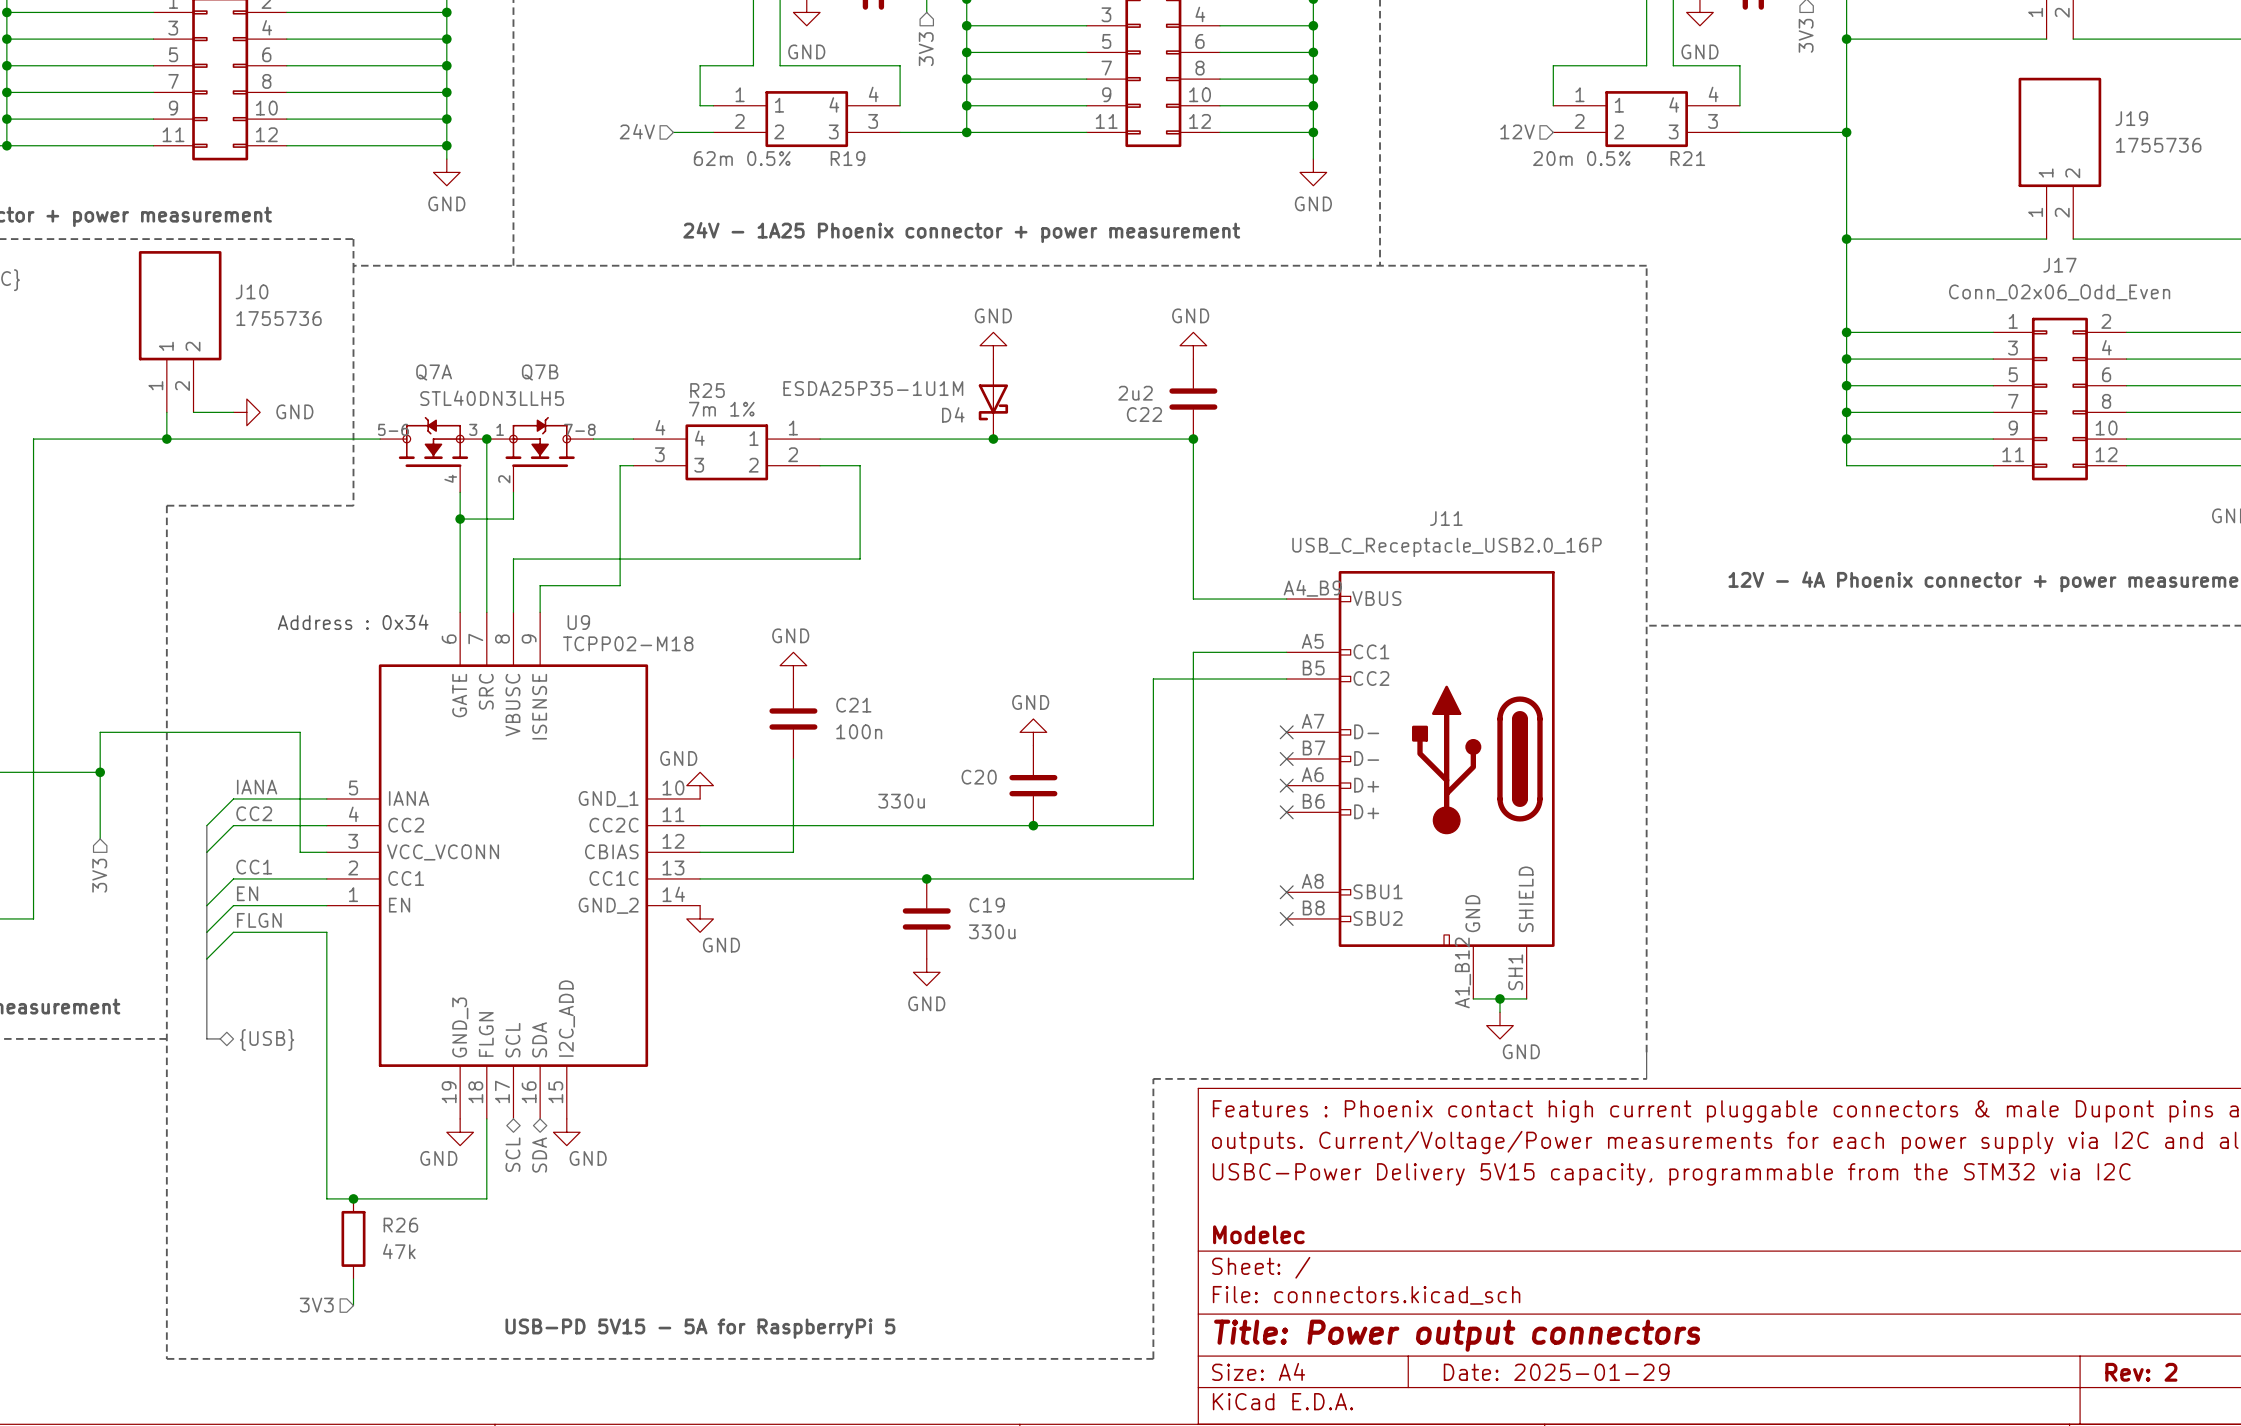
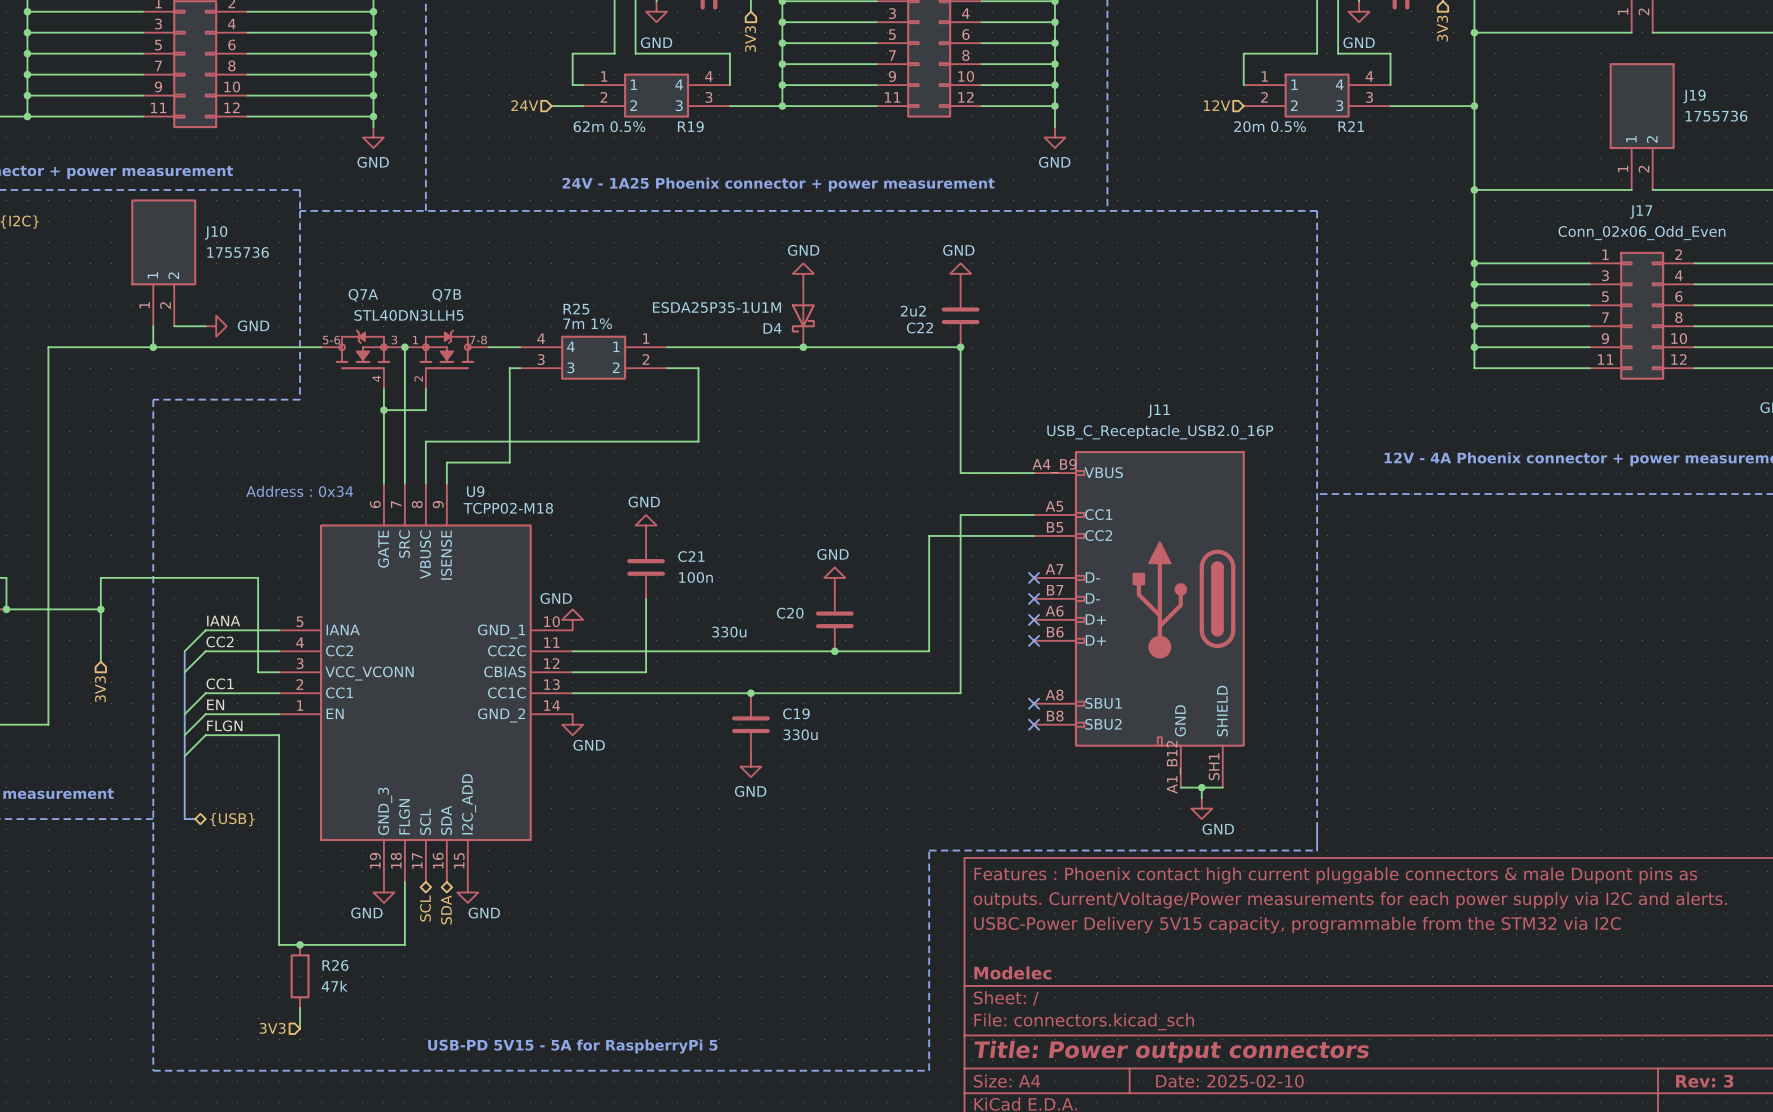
title block: Date: 2025-01-29 (1556, 1372) -> Date: 2025-02-10 (1229, 1081)
title block: Rev: 2 (2141, 1372) -> Rev: 3 (1704, 1081)

